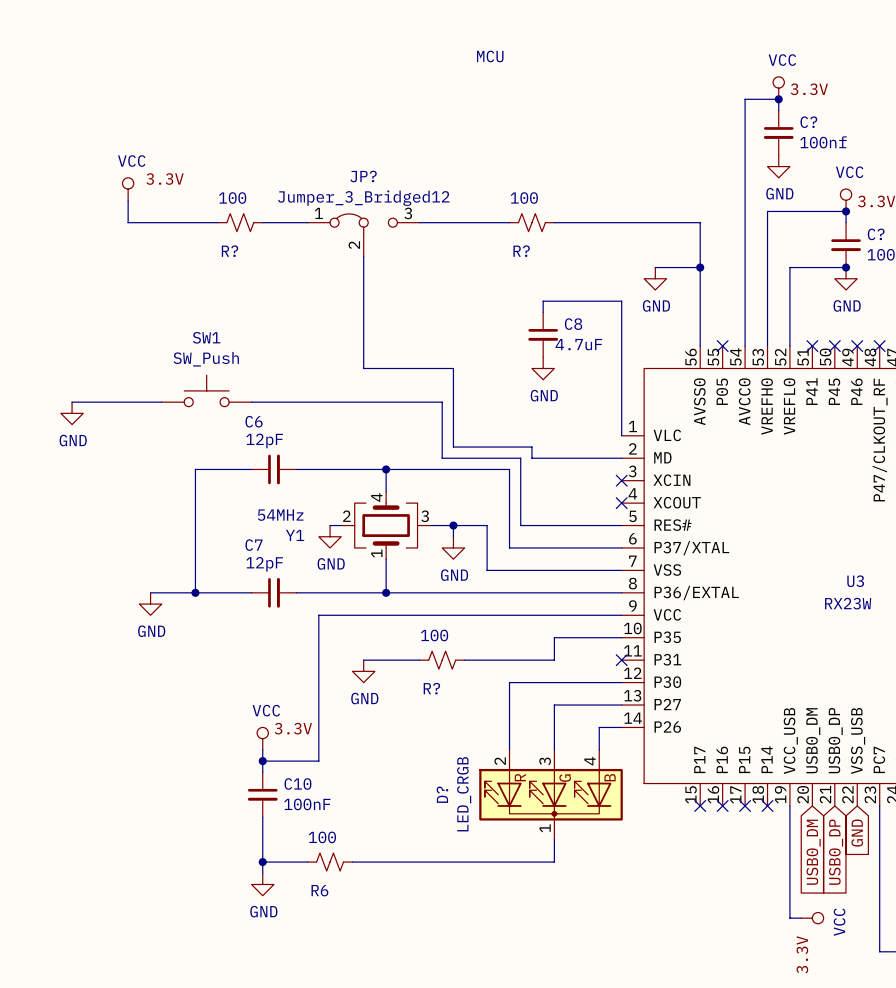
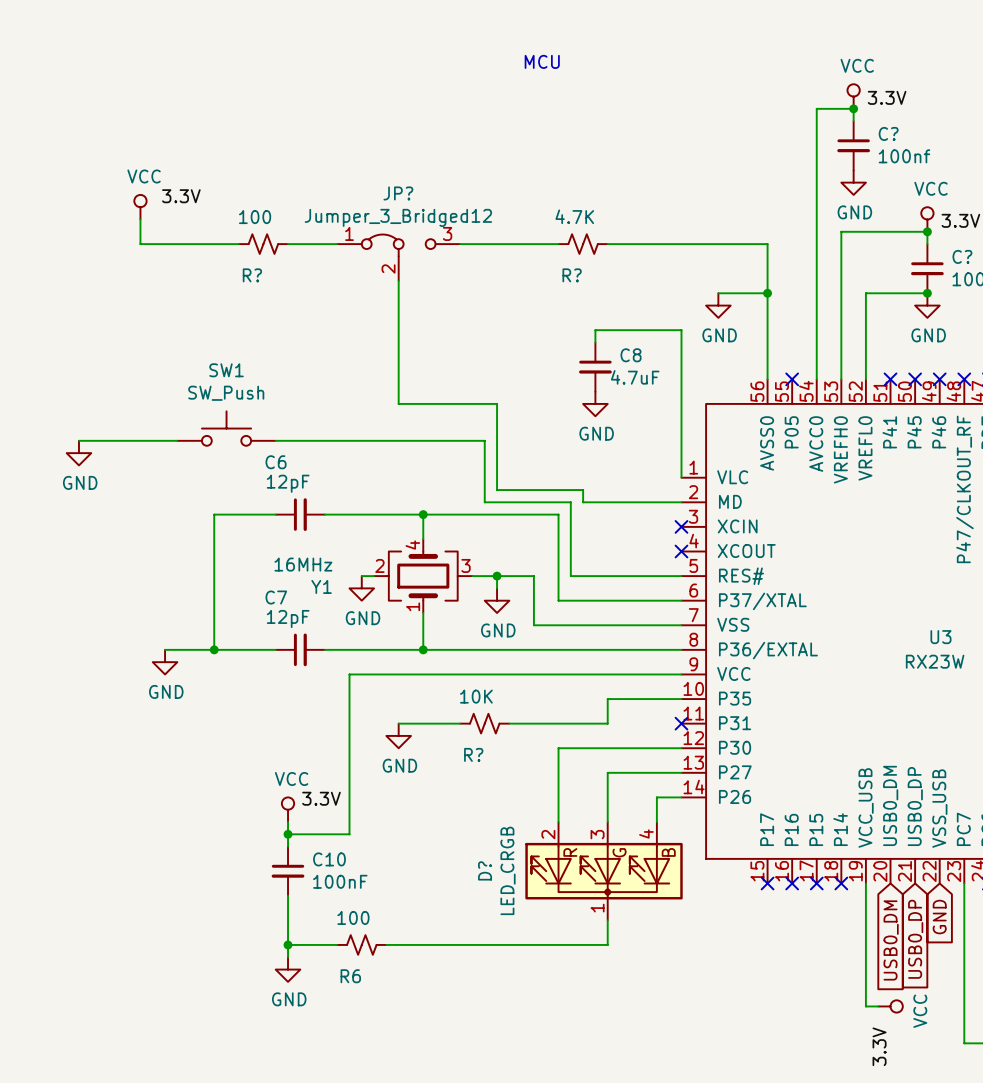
R? value: 100 (524, 198) -> 4.7K (574, 216)
Y1 value: 54MHz (280, 515) -> 16MHz (303, 564)
R? value: 100 (434, 635) -> 10K (476, 696)

